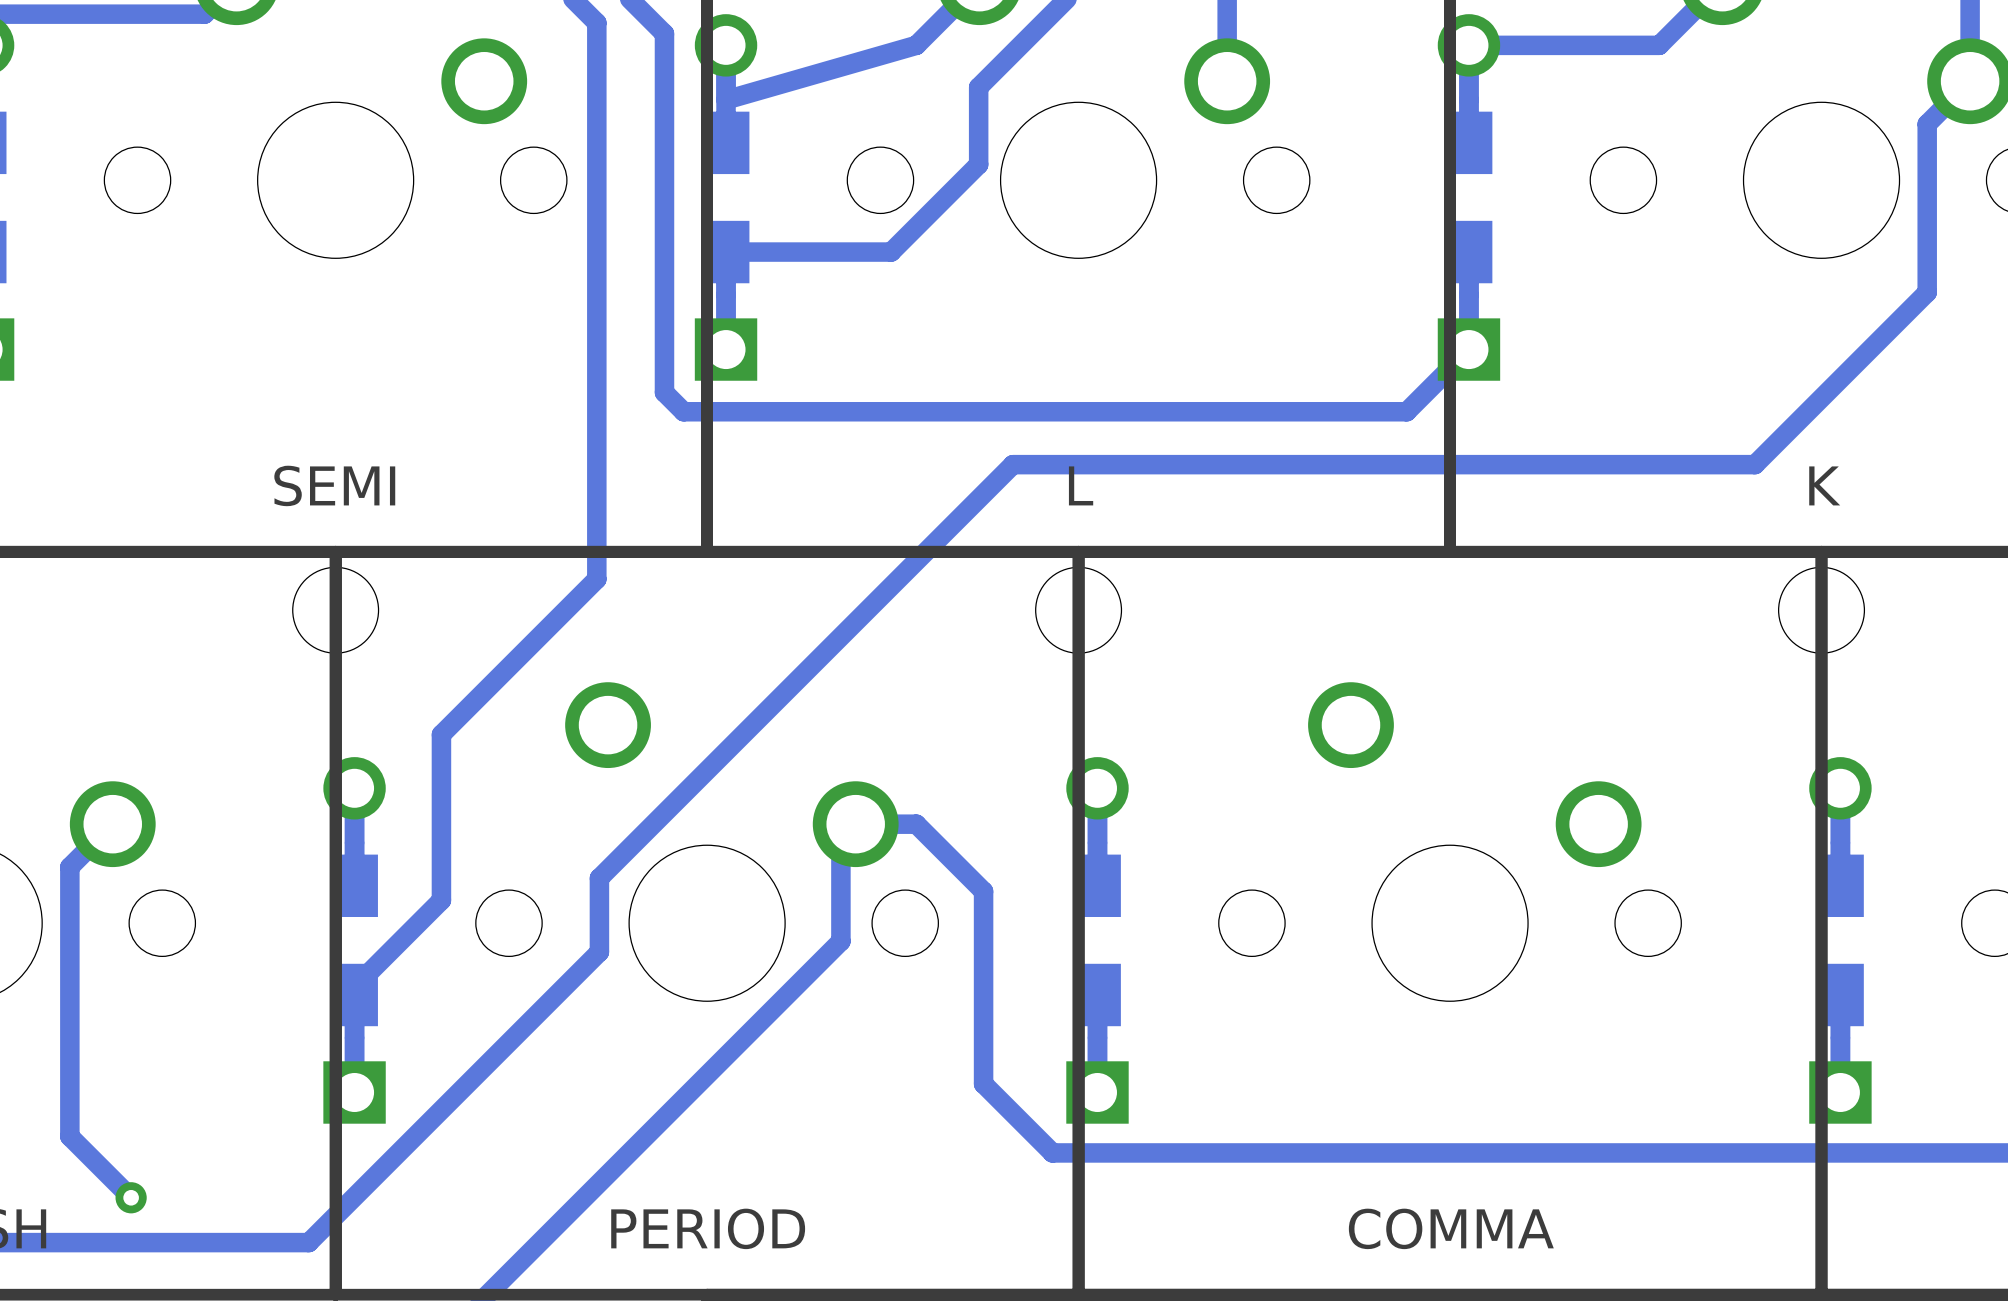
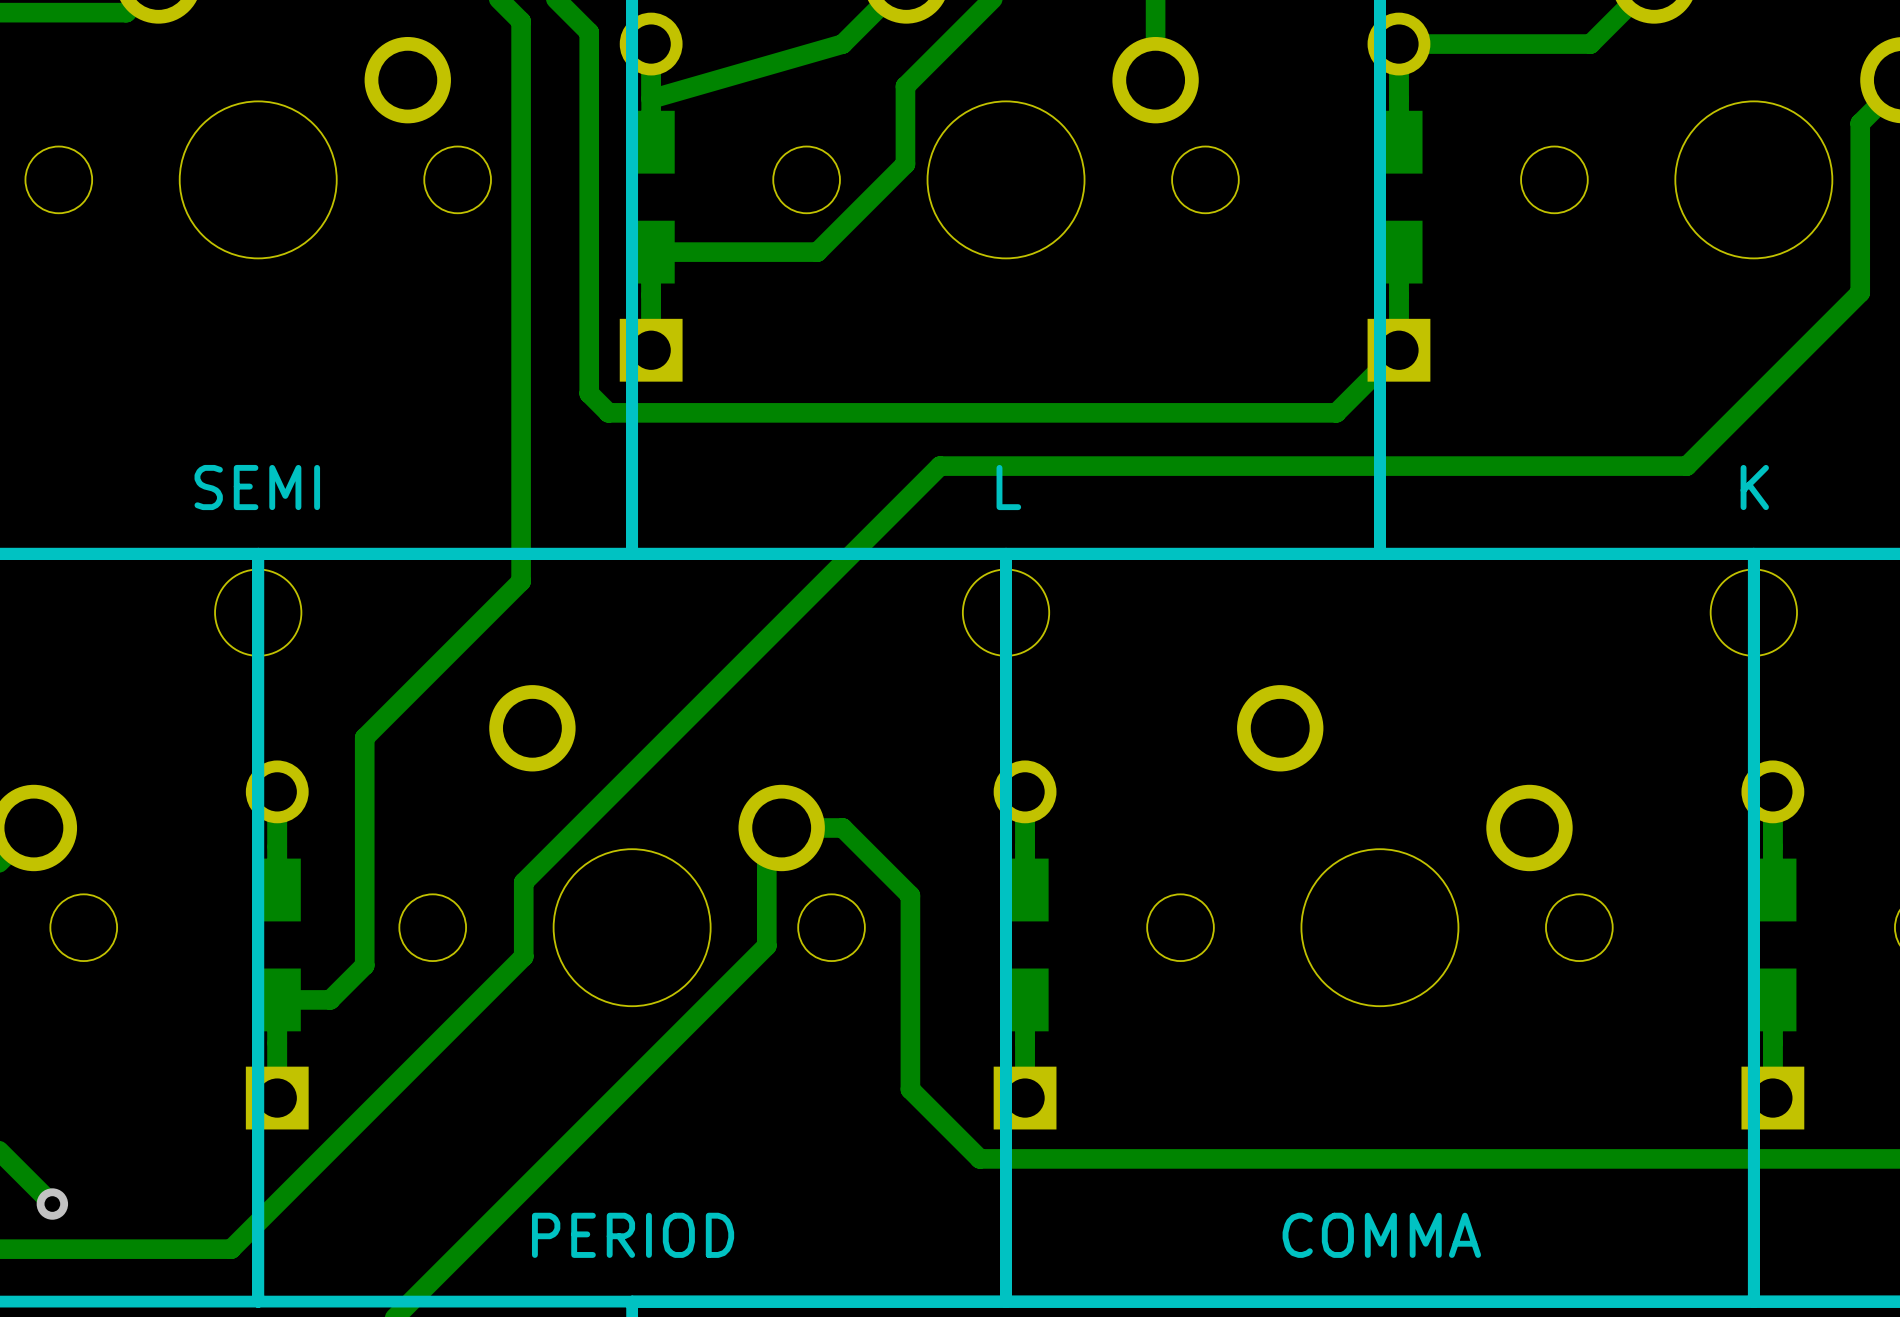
track: (441, 900) (354, 987) (354, 994) -> (364, 904) (364, 965) (330, 999) (277, 999)

